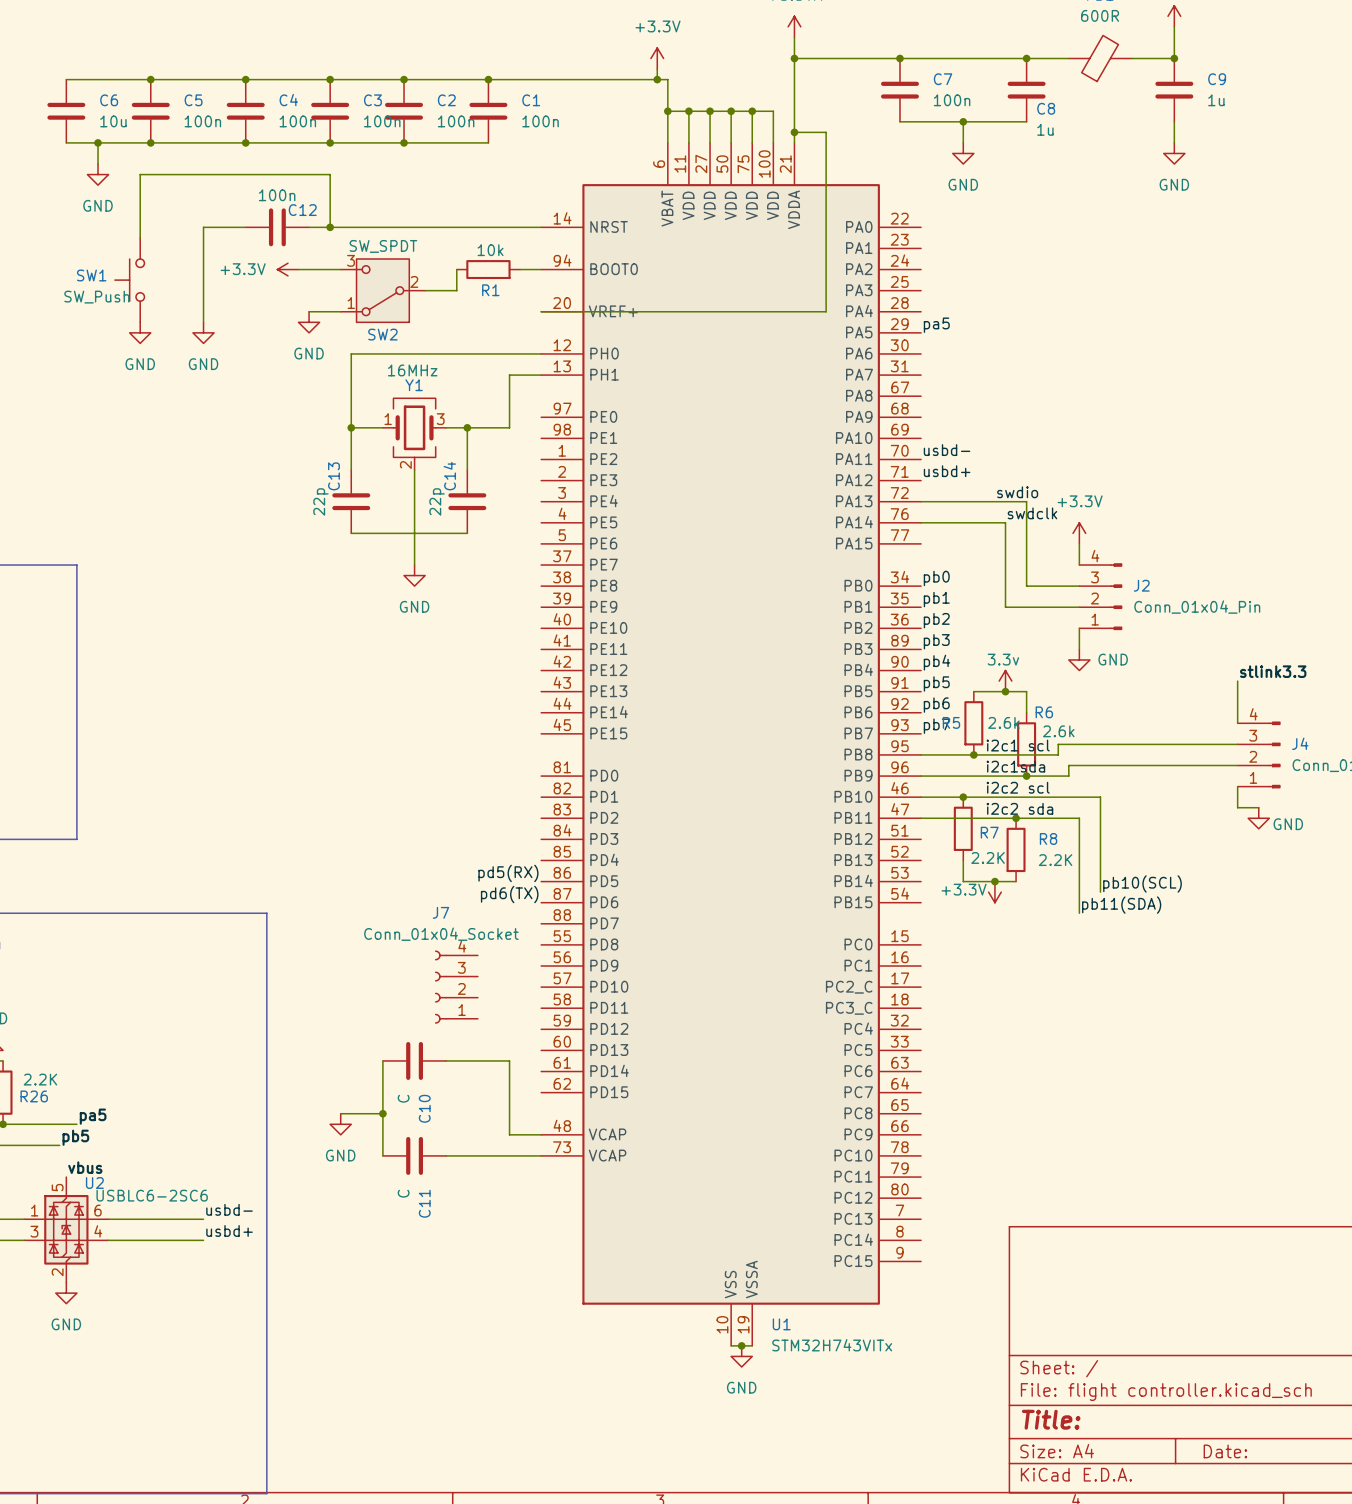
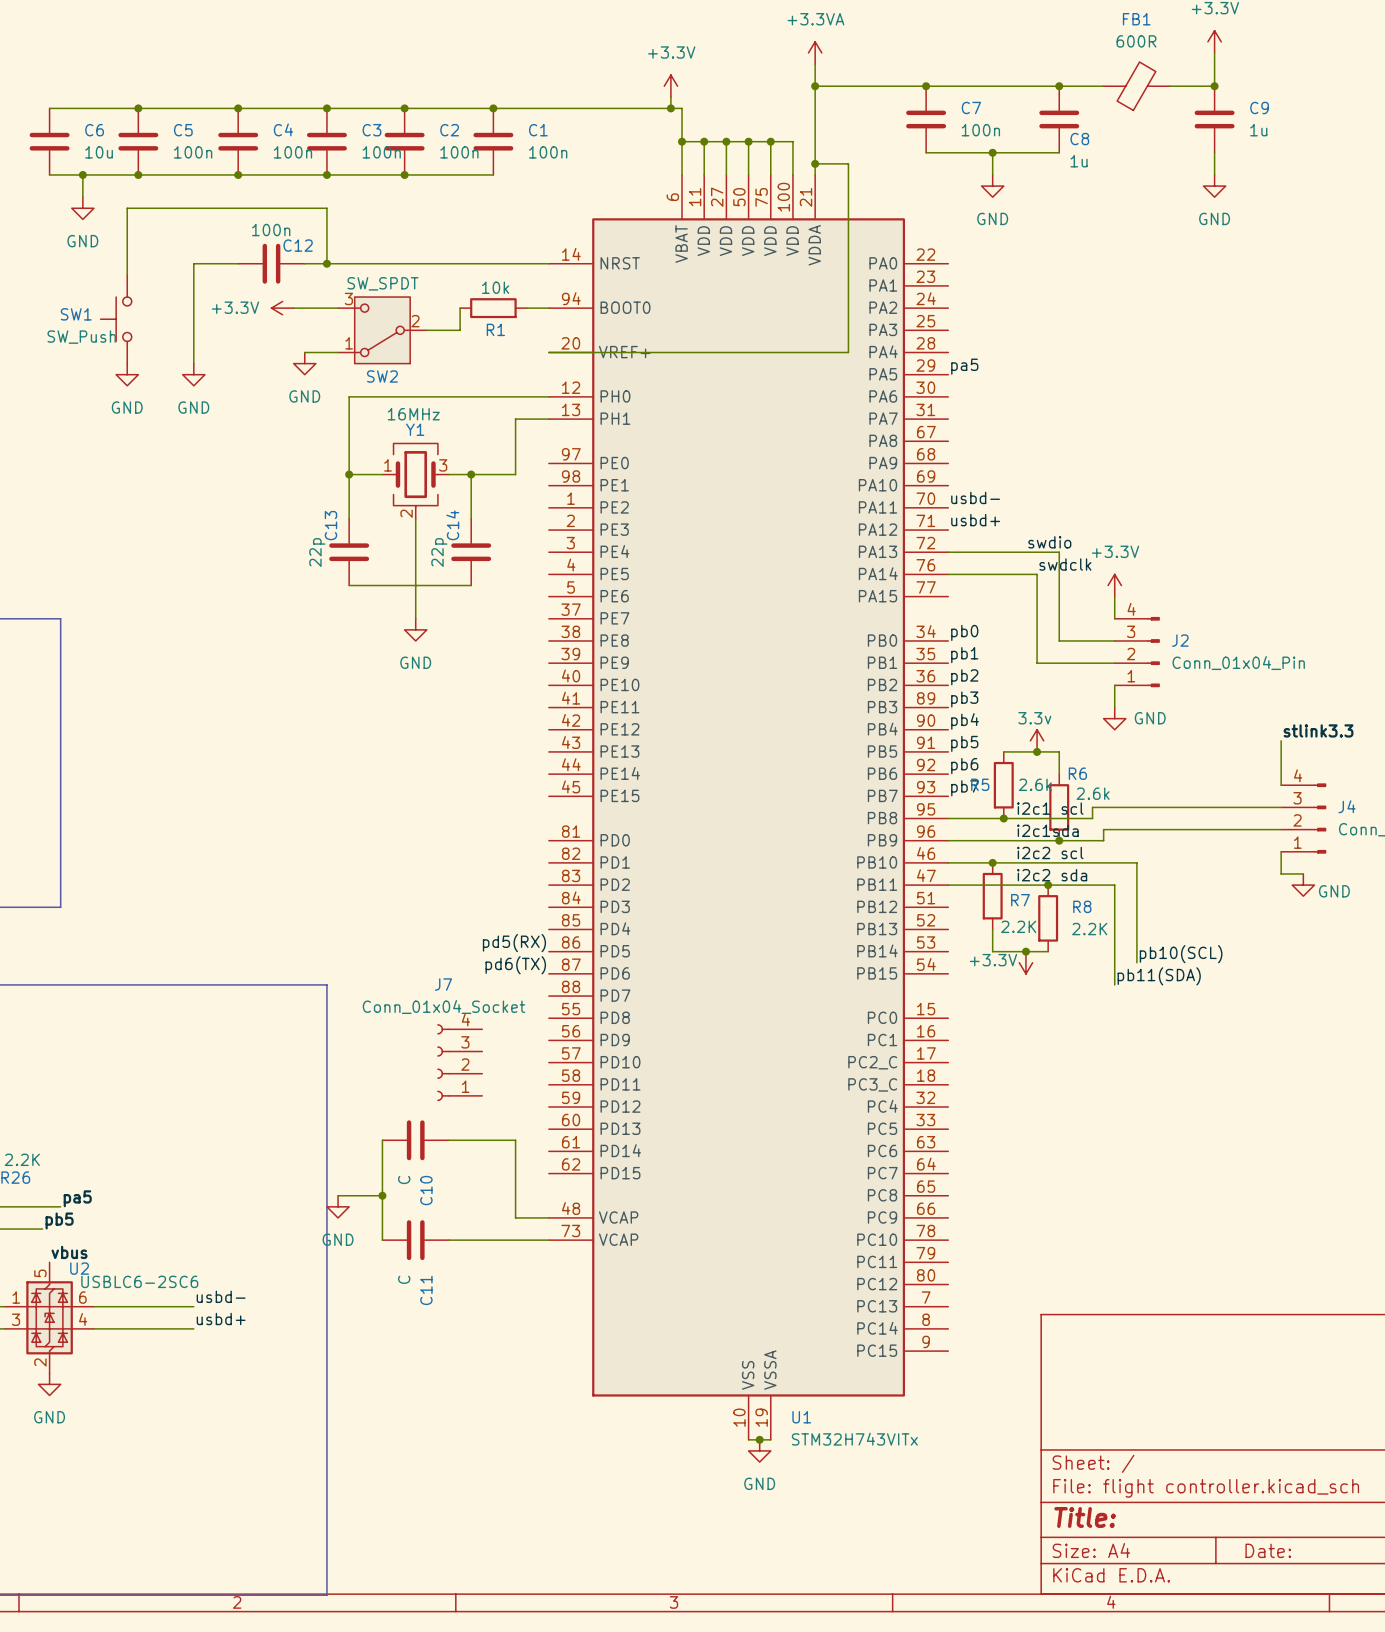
line: (266, 913) (266, 1493) -> (260, 984) (326, 984) (326, 1595) (260, 1595)

